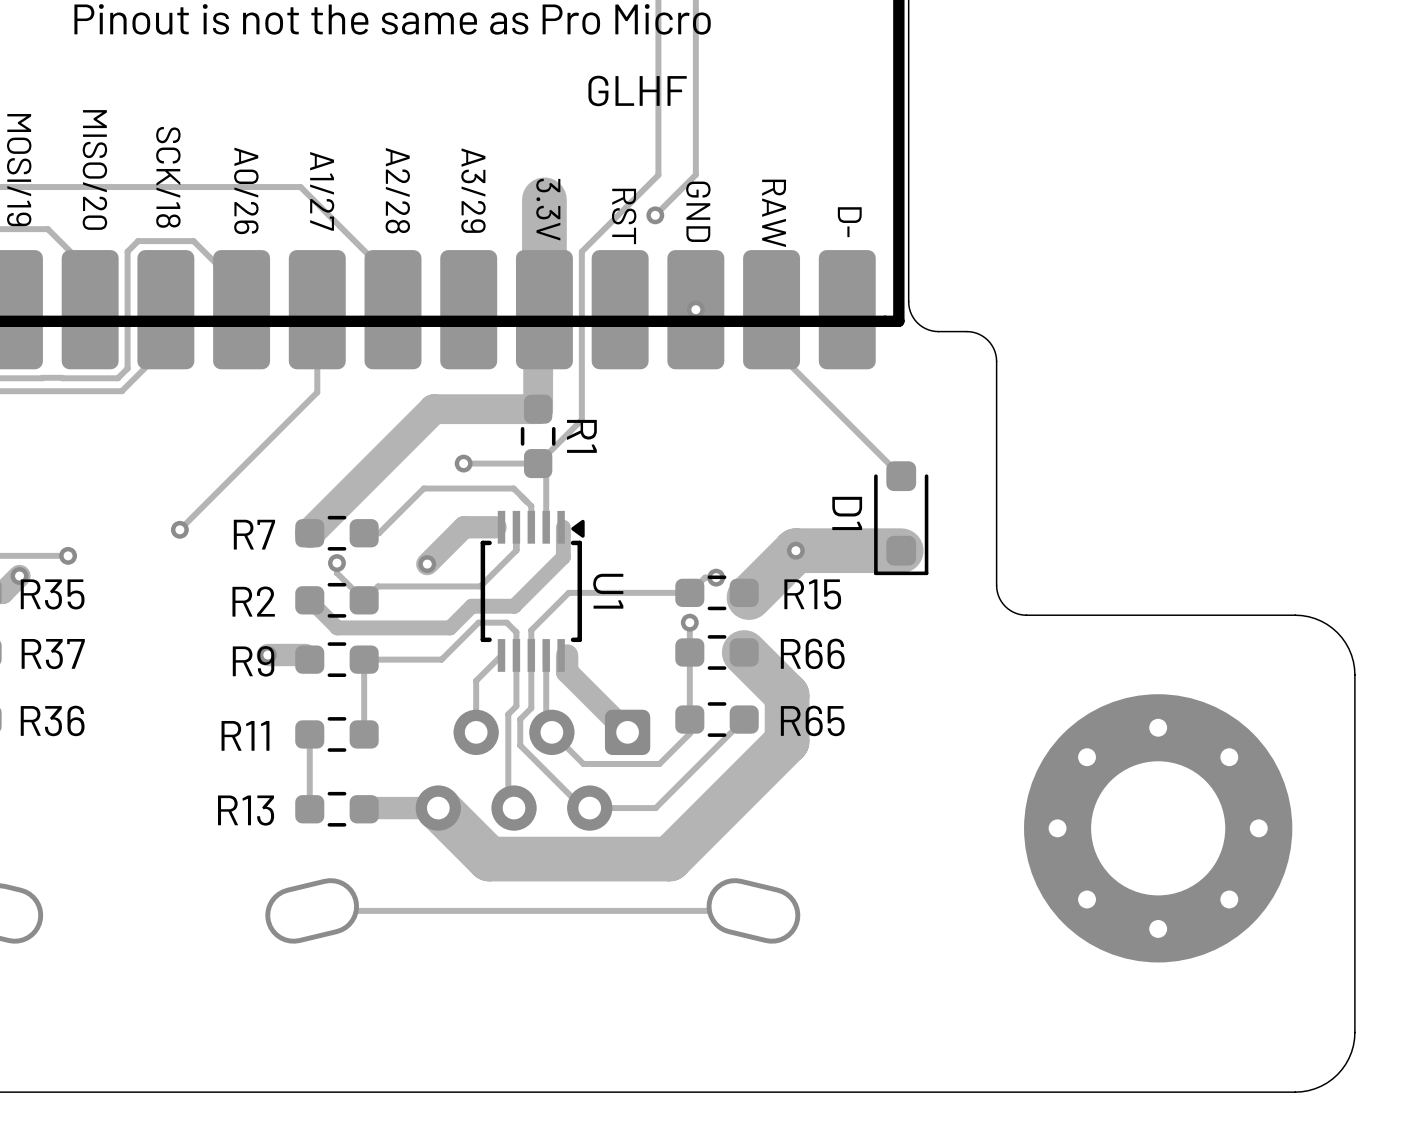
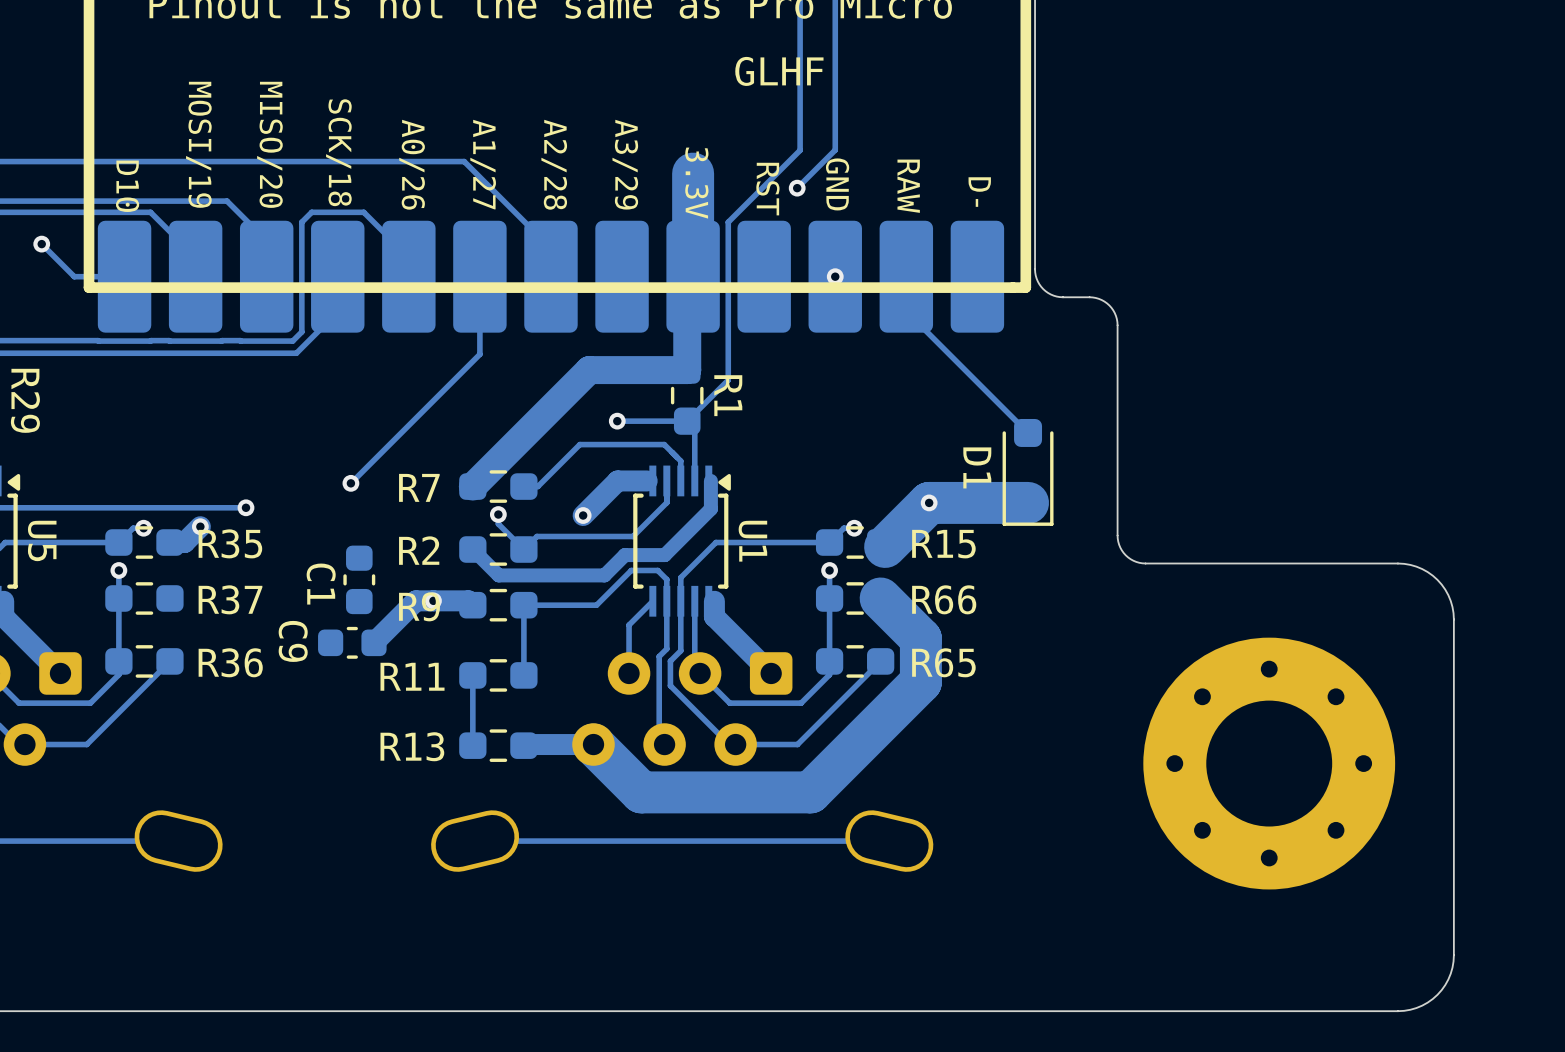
C1: none -> (359, 579)
track: none -> (433, 600) (415, 600) (374, 642)
C9: none -> (352, 642)

